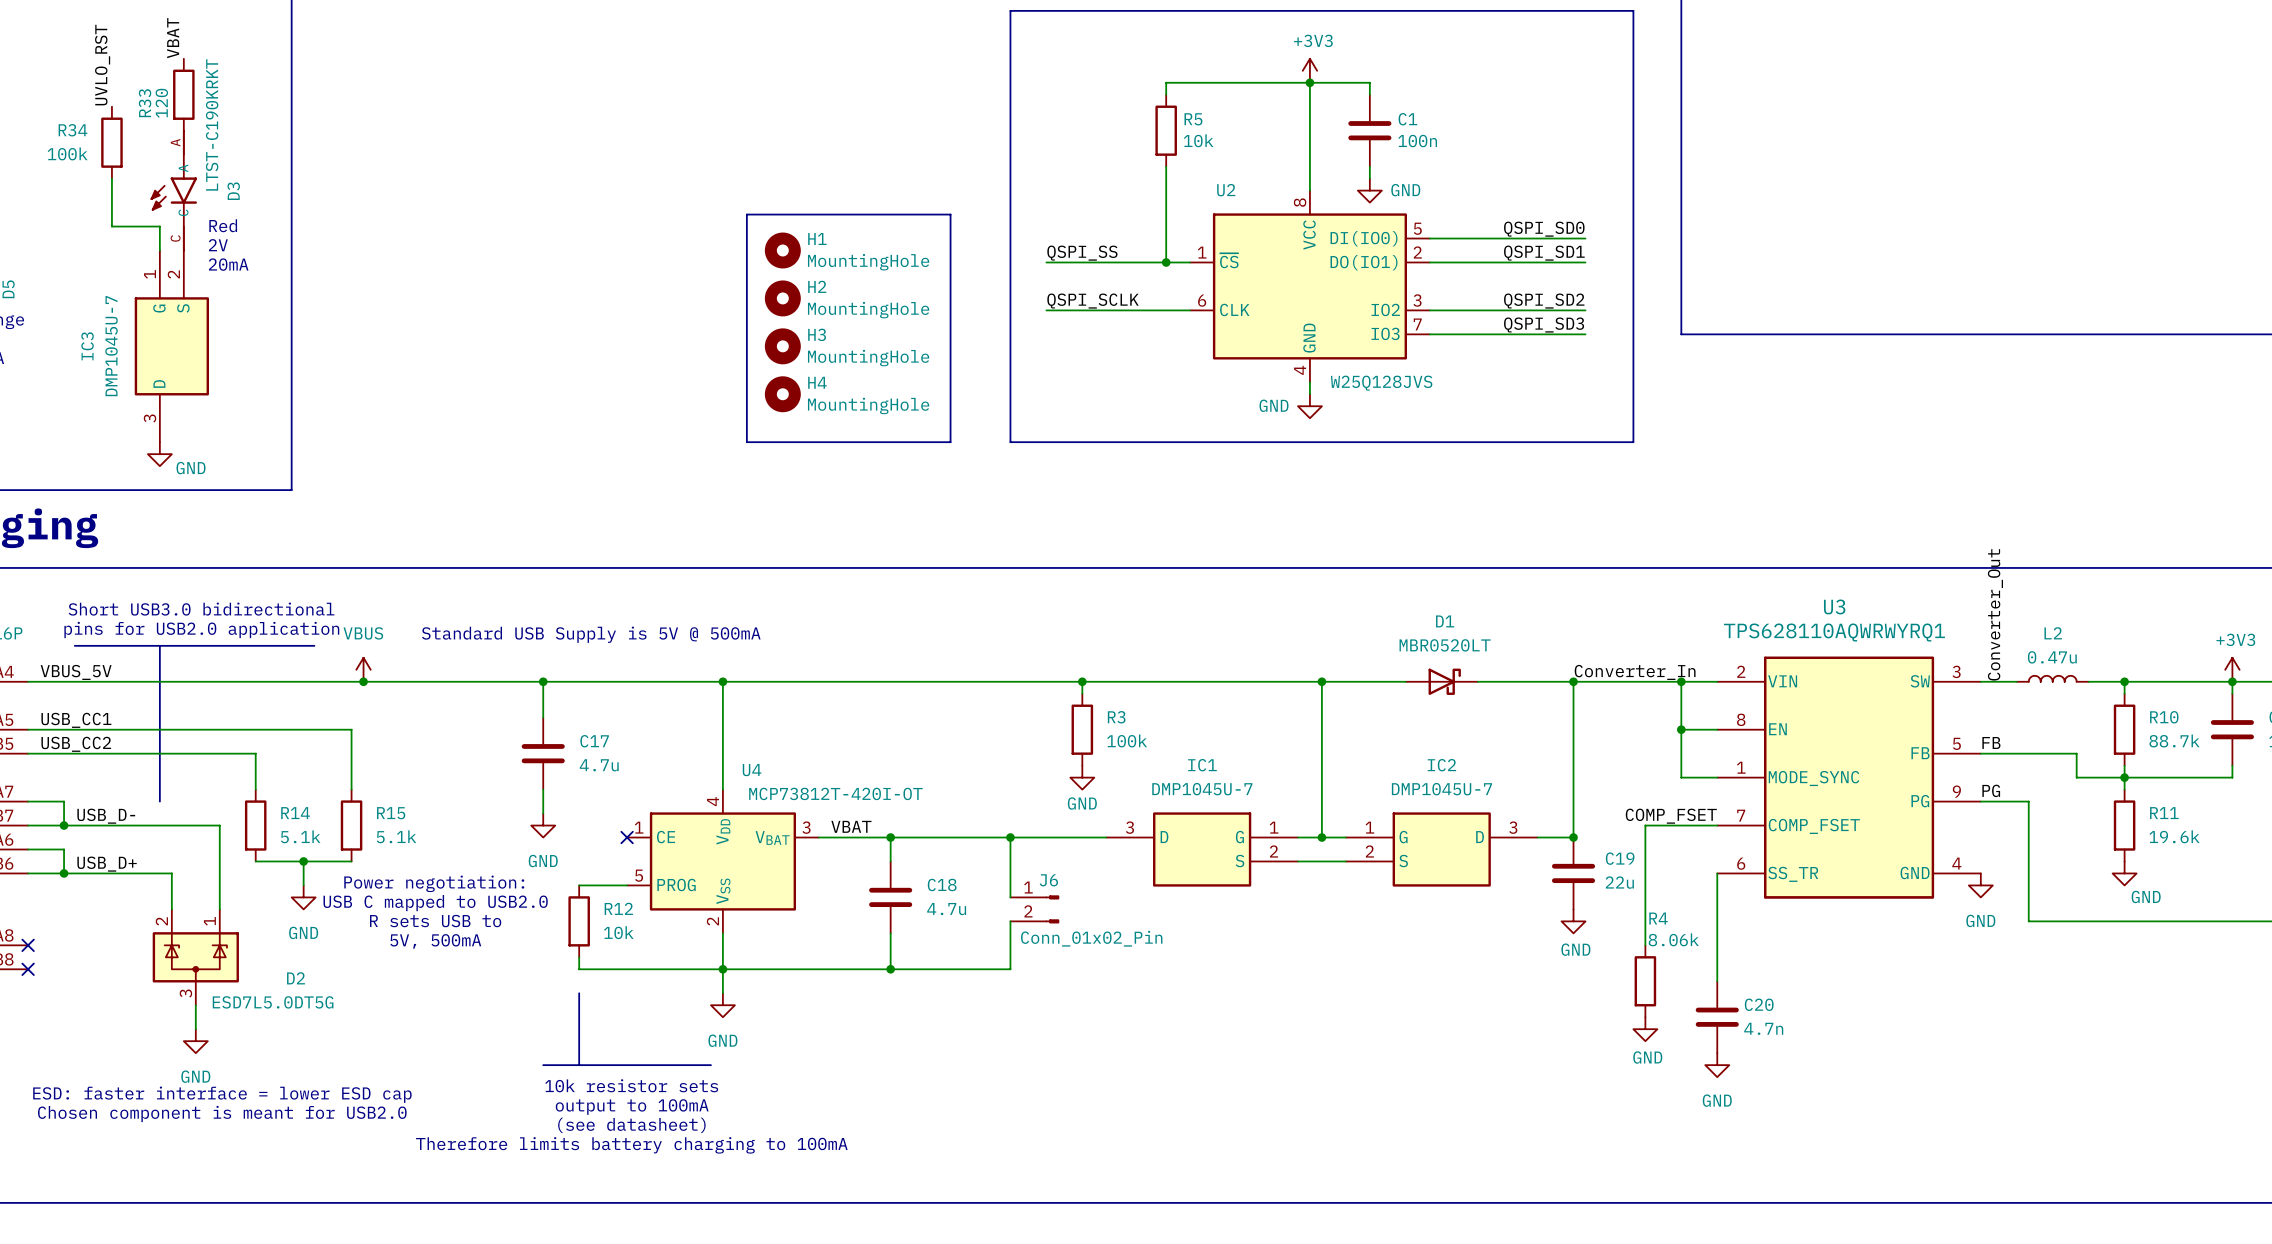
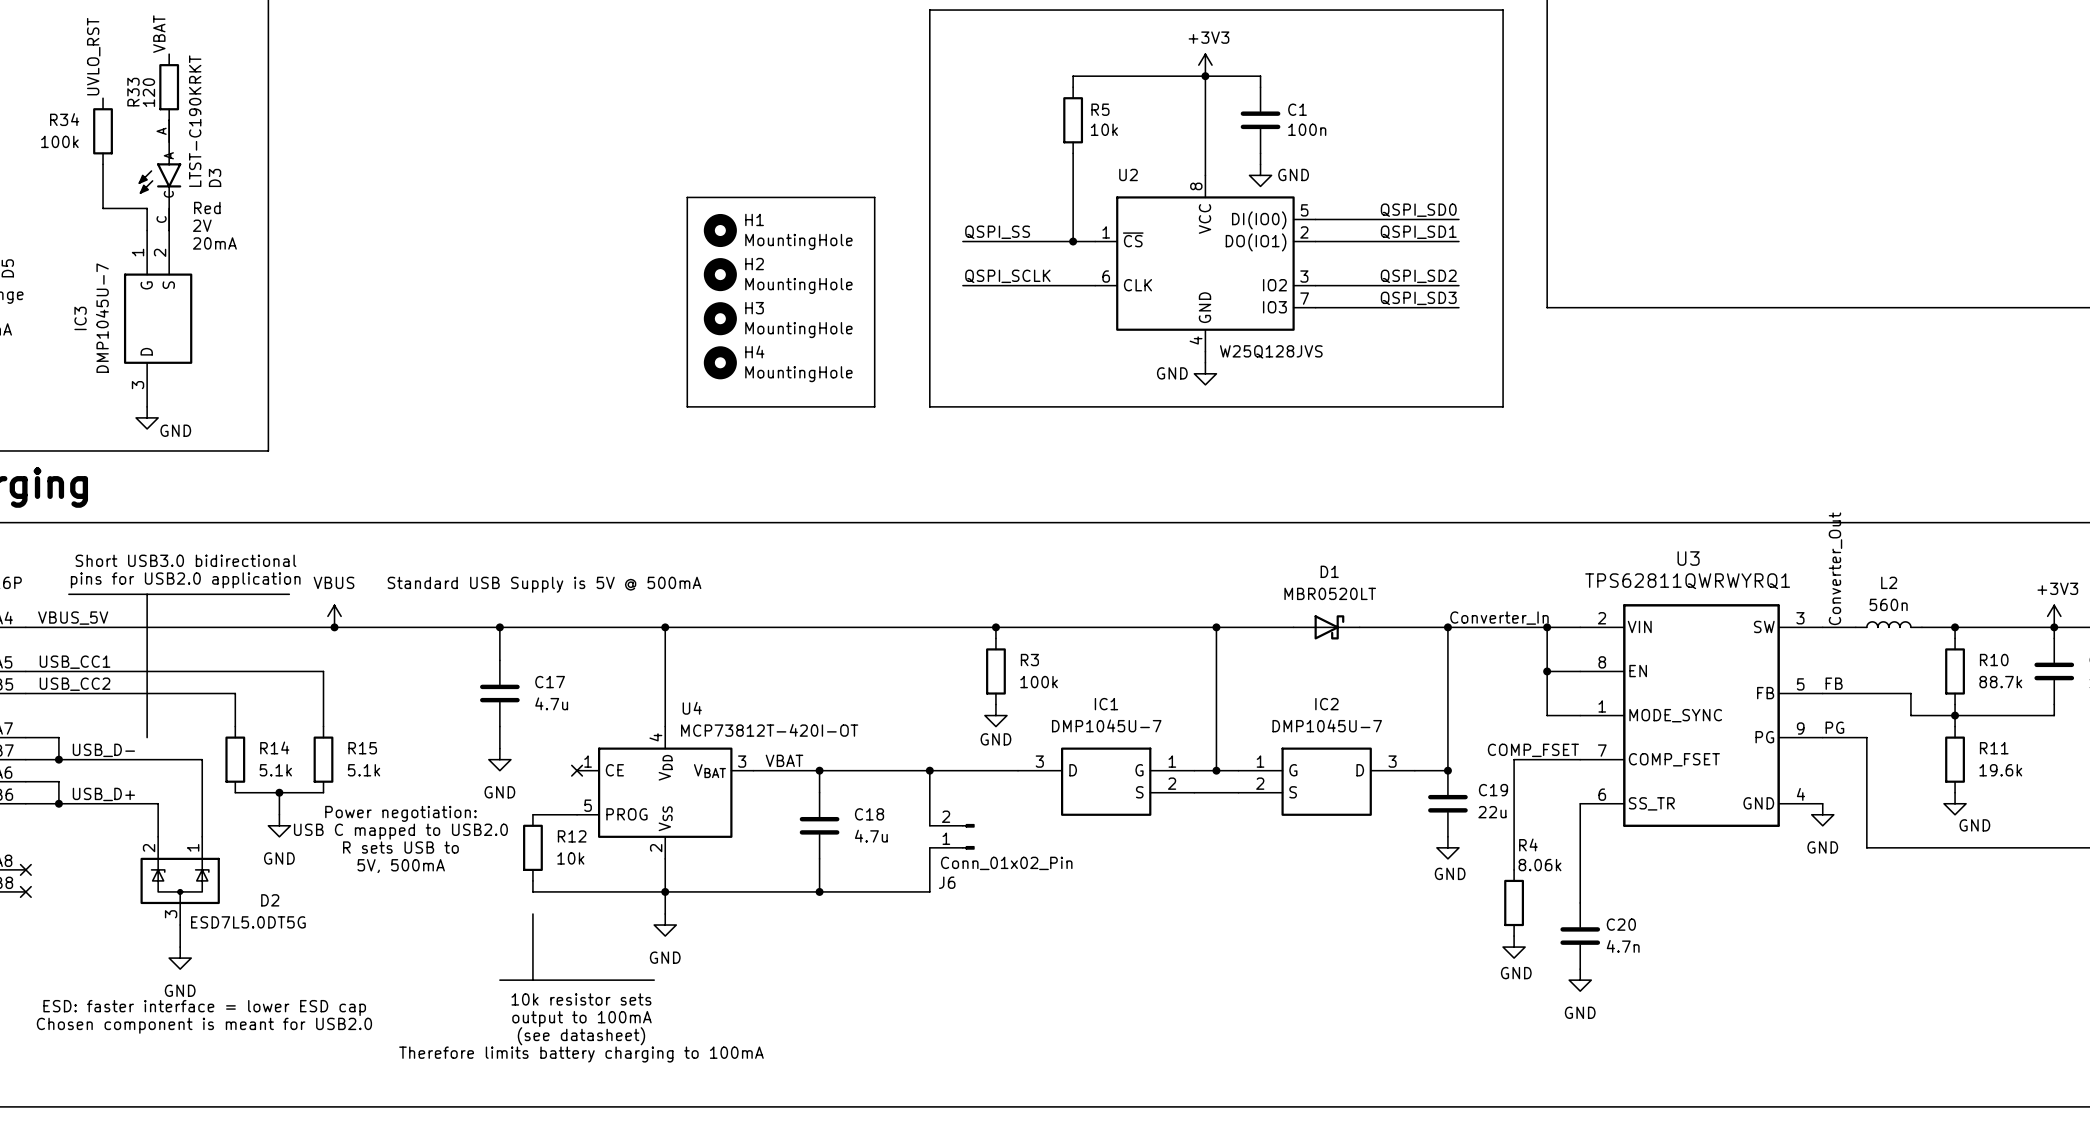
U3 value: TPS628110AQWRWYRQ1 (1834, 632) -> TPS62811QWRWYRQ1 (1687, 581)
L2 value: 0.47u (2052, 657) -> 560n (1888, 604)
J6 name position: J6 (1048, 880) -> J6 (947, 882)
J6 flip: as is (1052, 909) -> up-down (968, 836)

